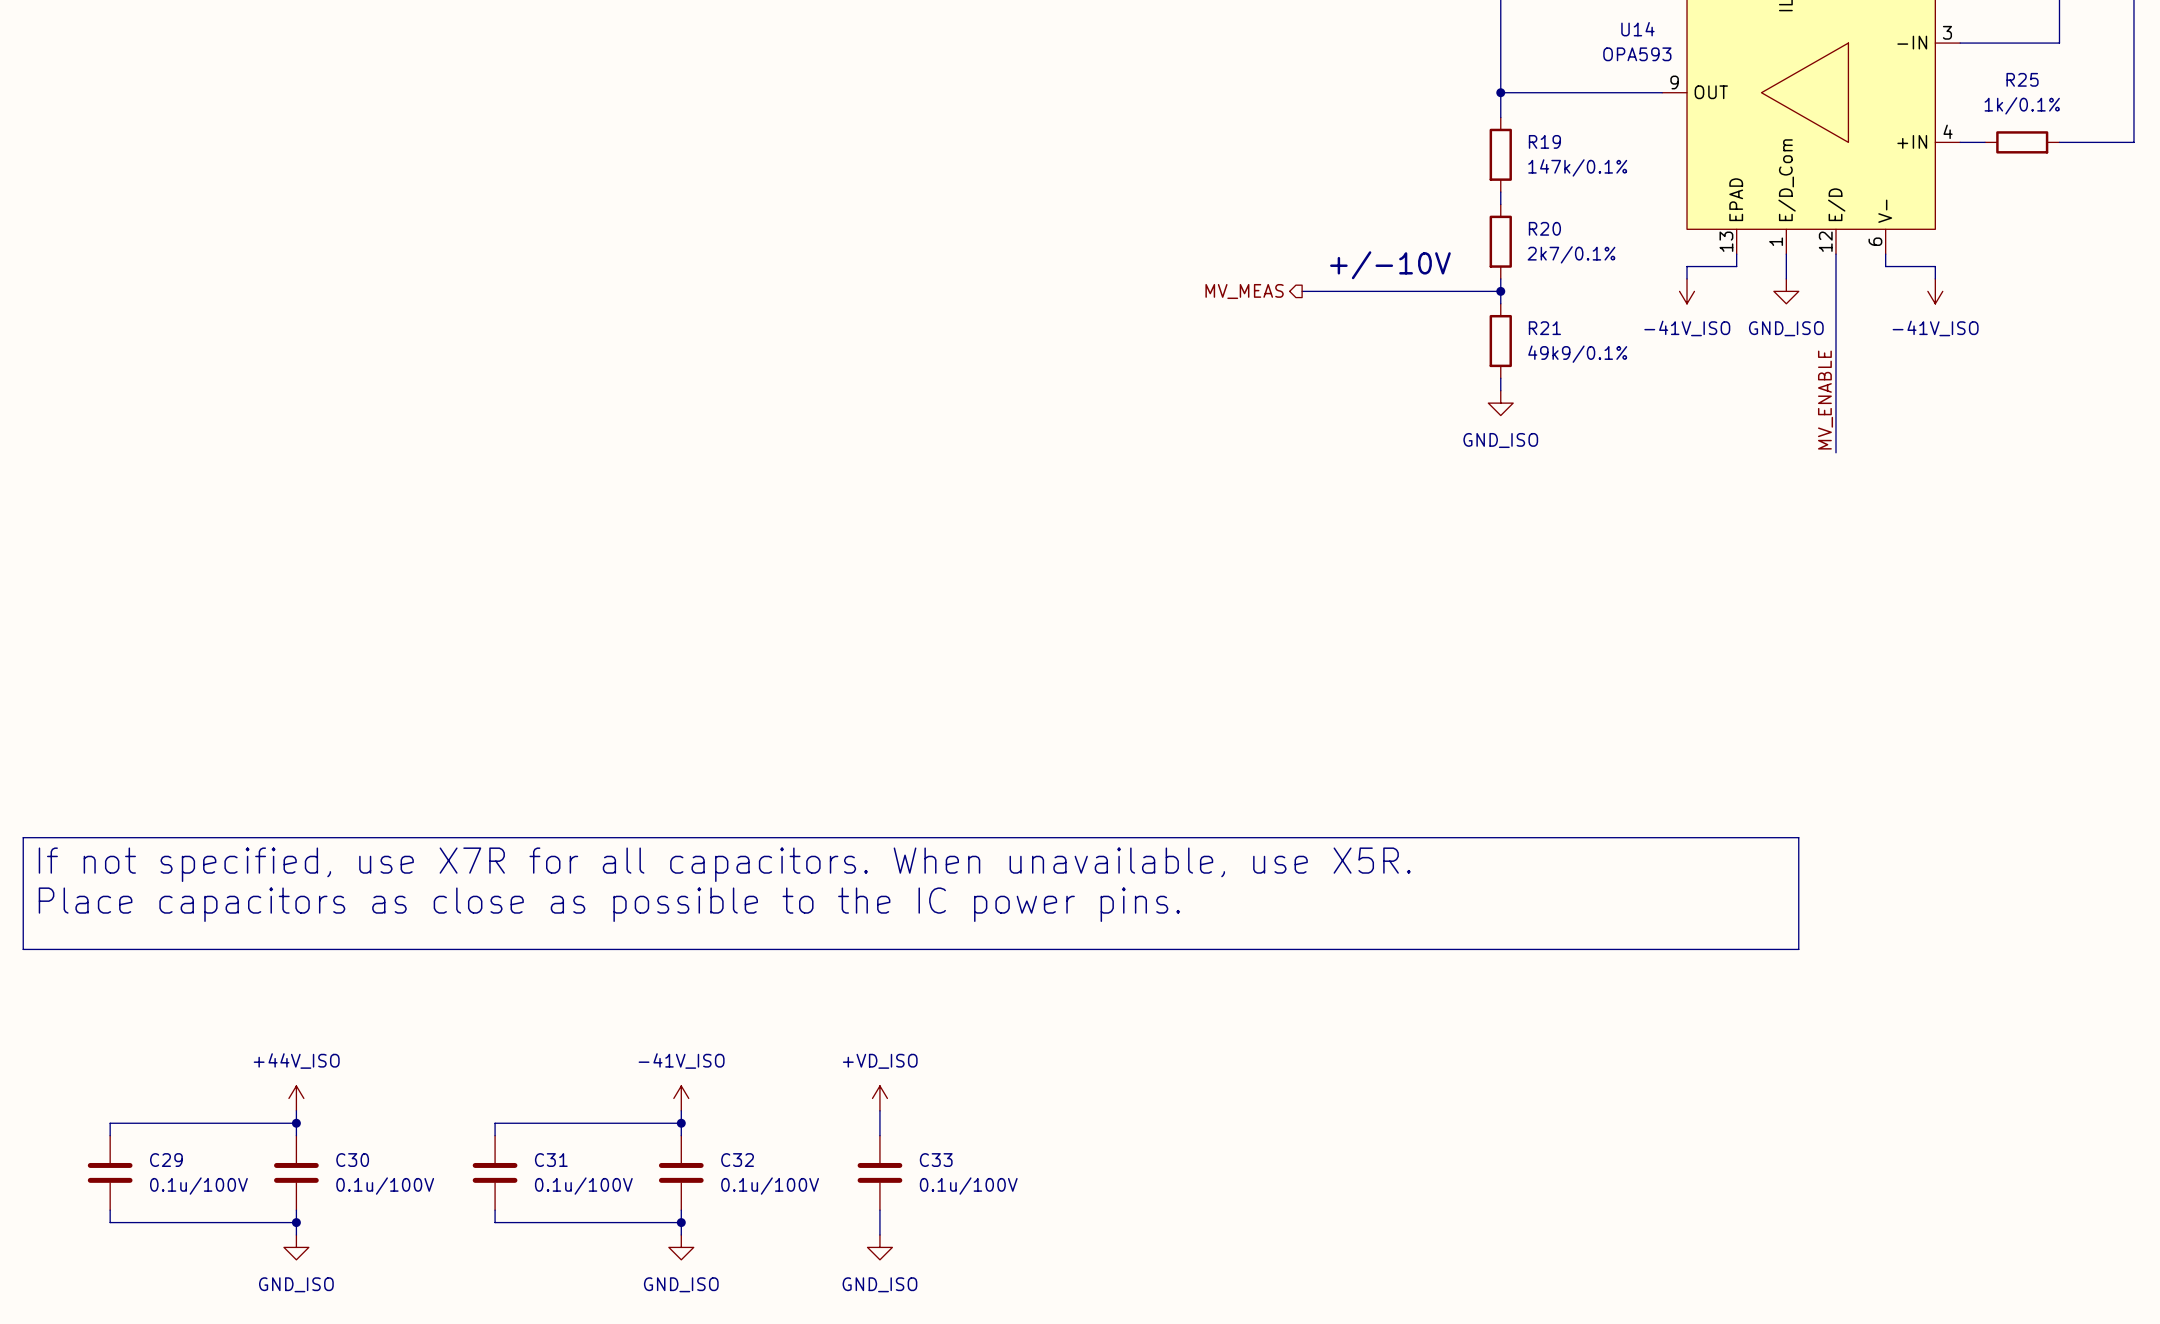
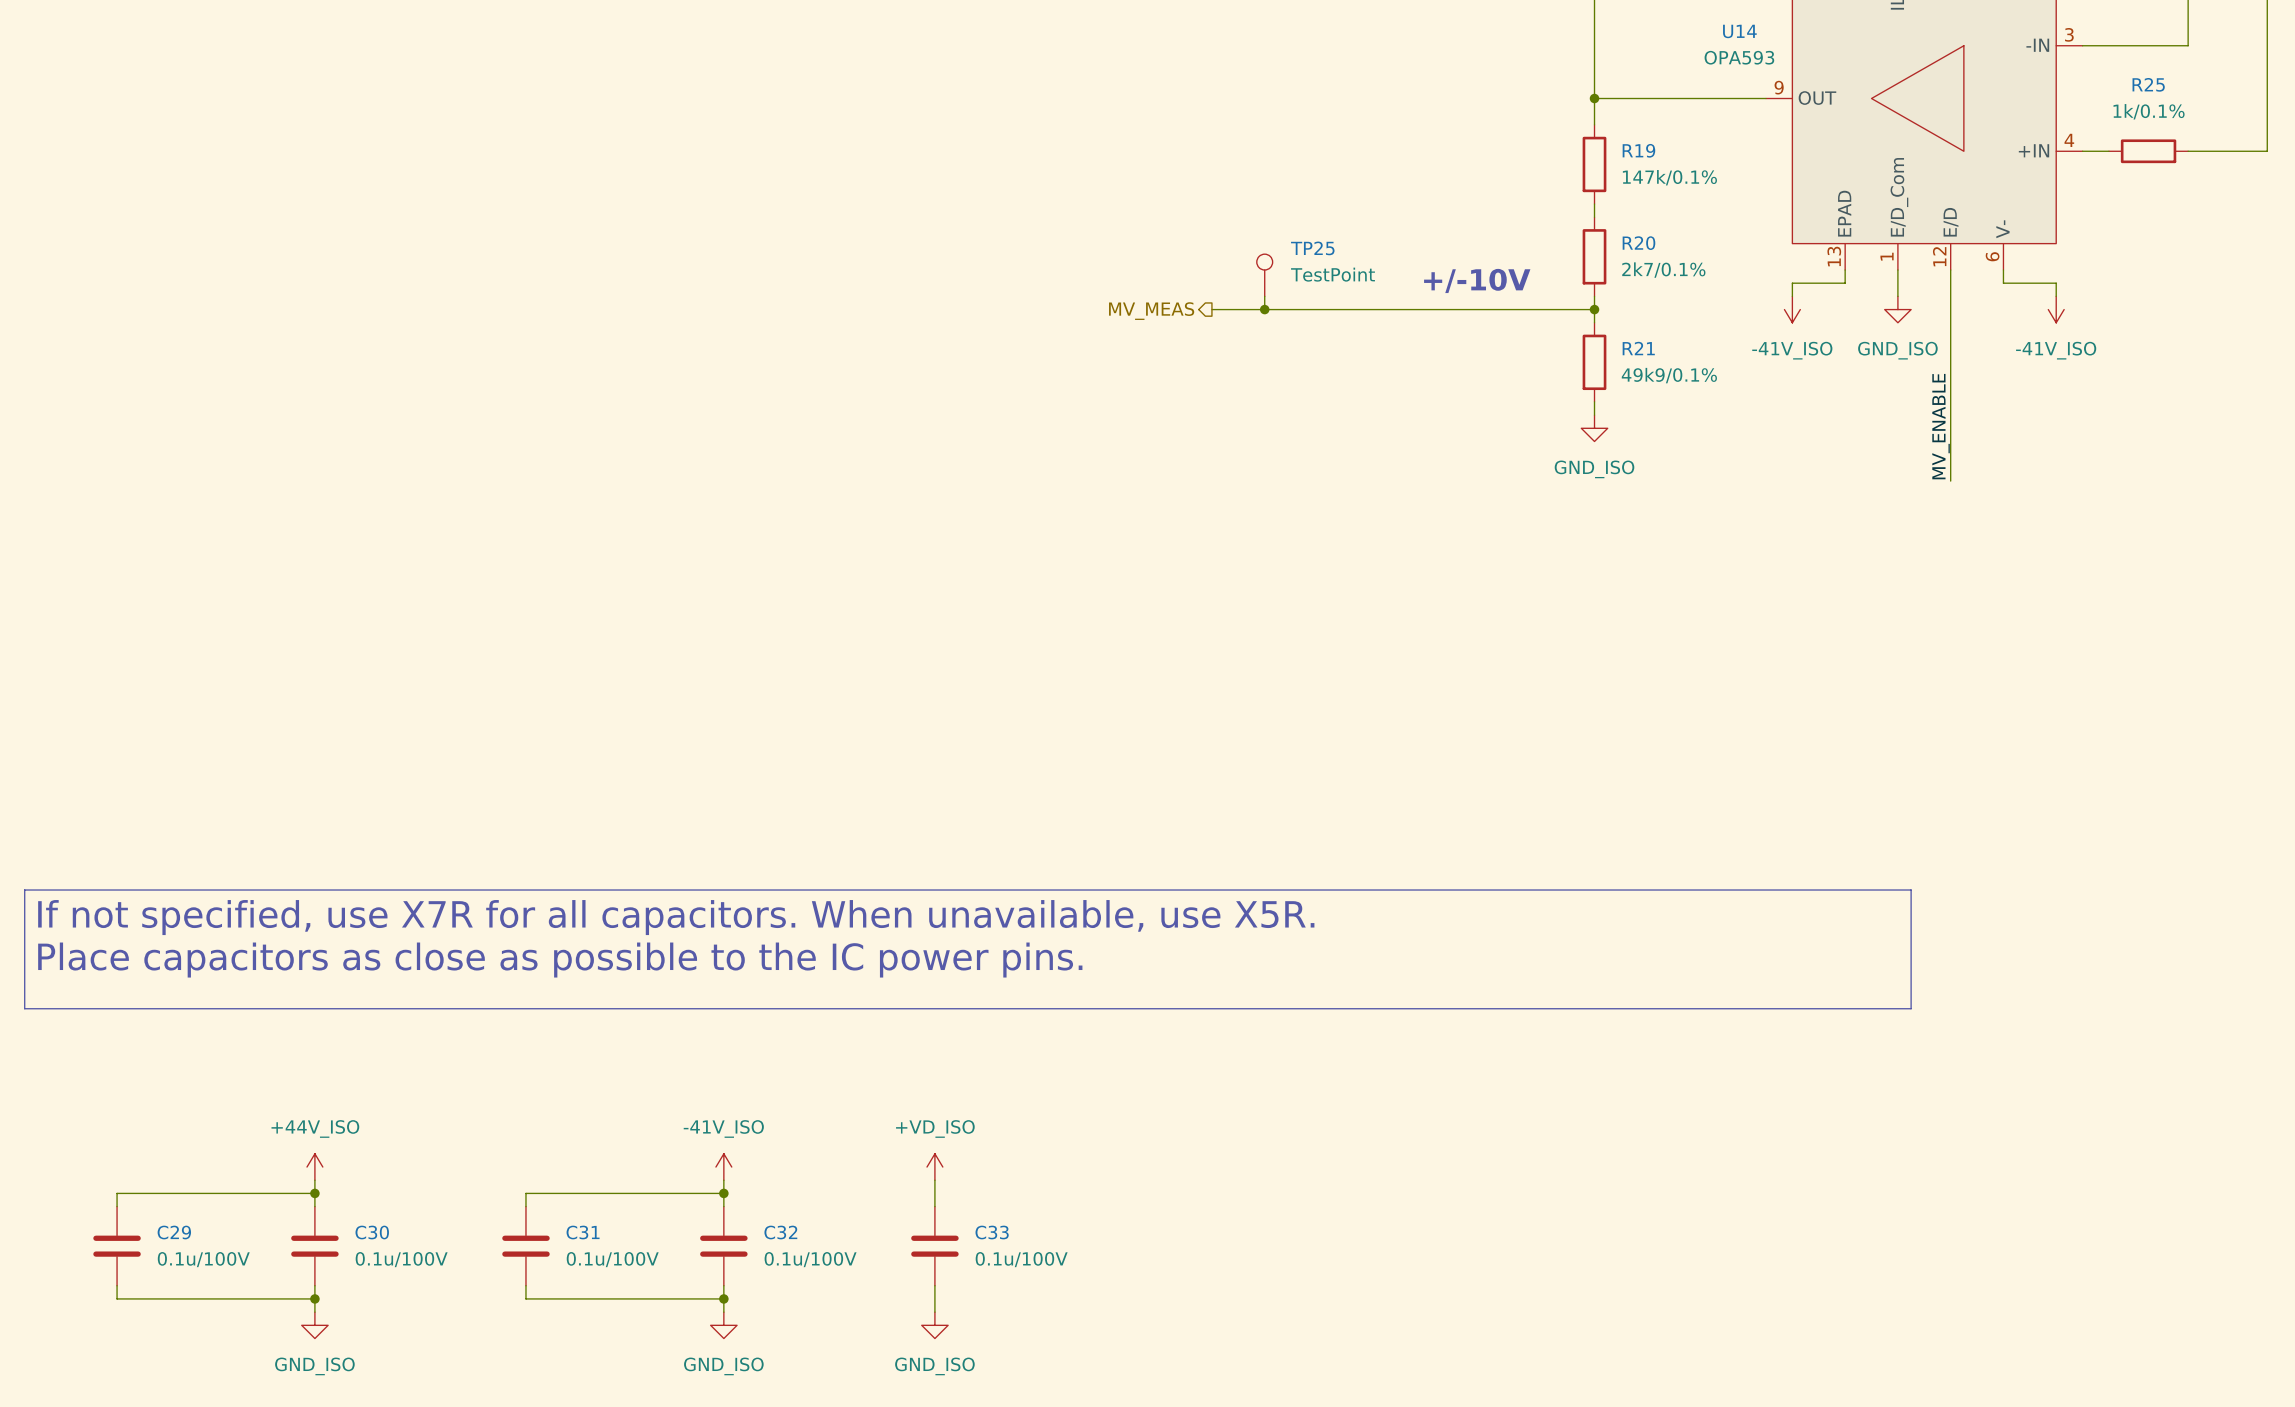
TP25: none -> TestPoint (1264, 275)
wire: none -> (1264, 296) (1264, 309)
wire: none -> (1211, 309) (1383, 309)
junction: none -> (1264, 309)
hierarchical label position: MV_MEAS (1244, 291) -> MV_MEAS (1151, 311)

